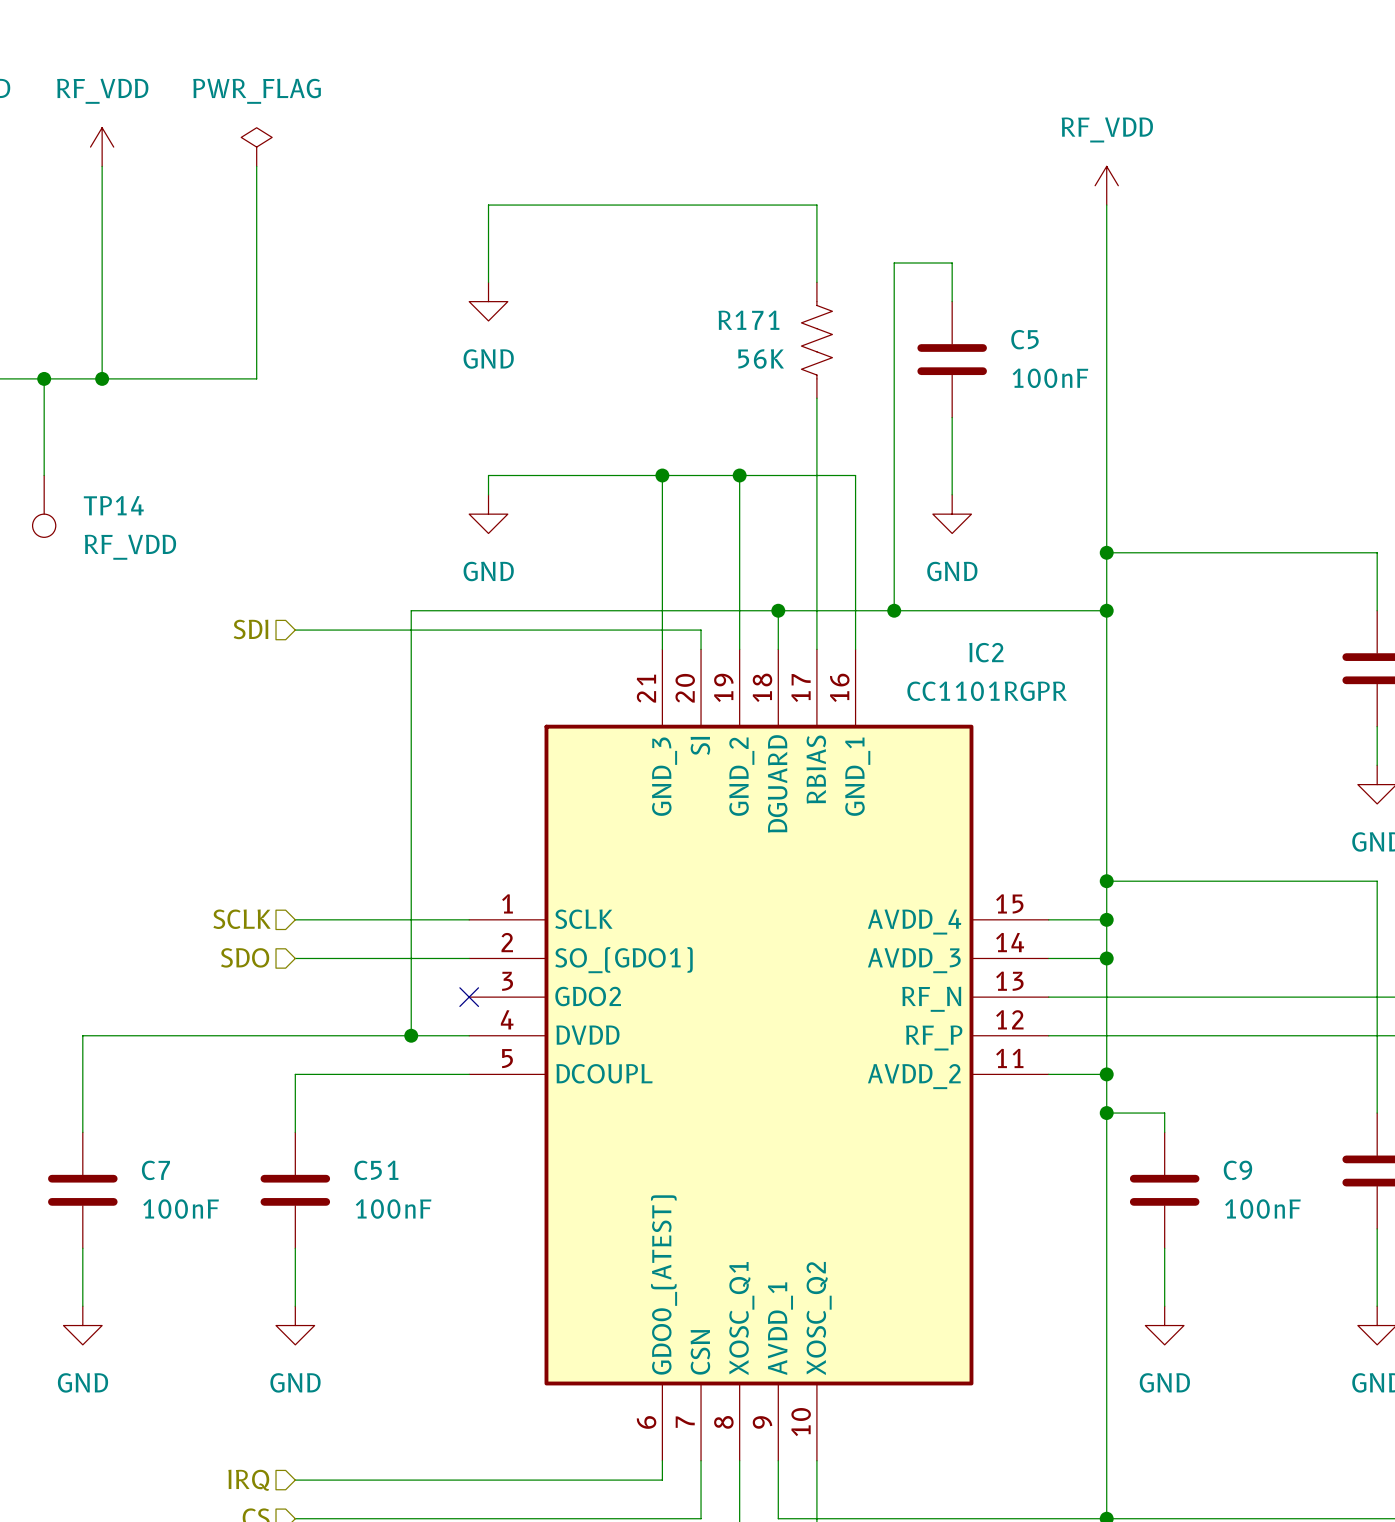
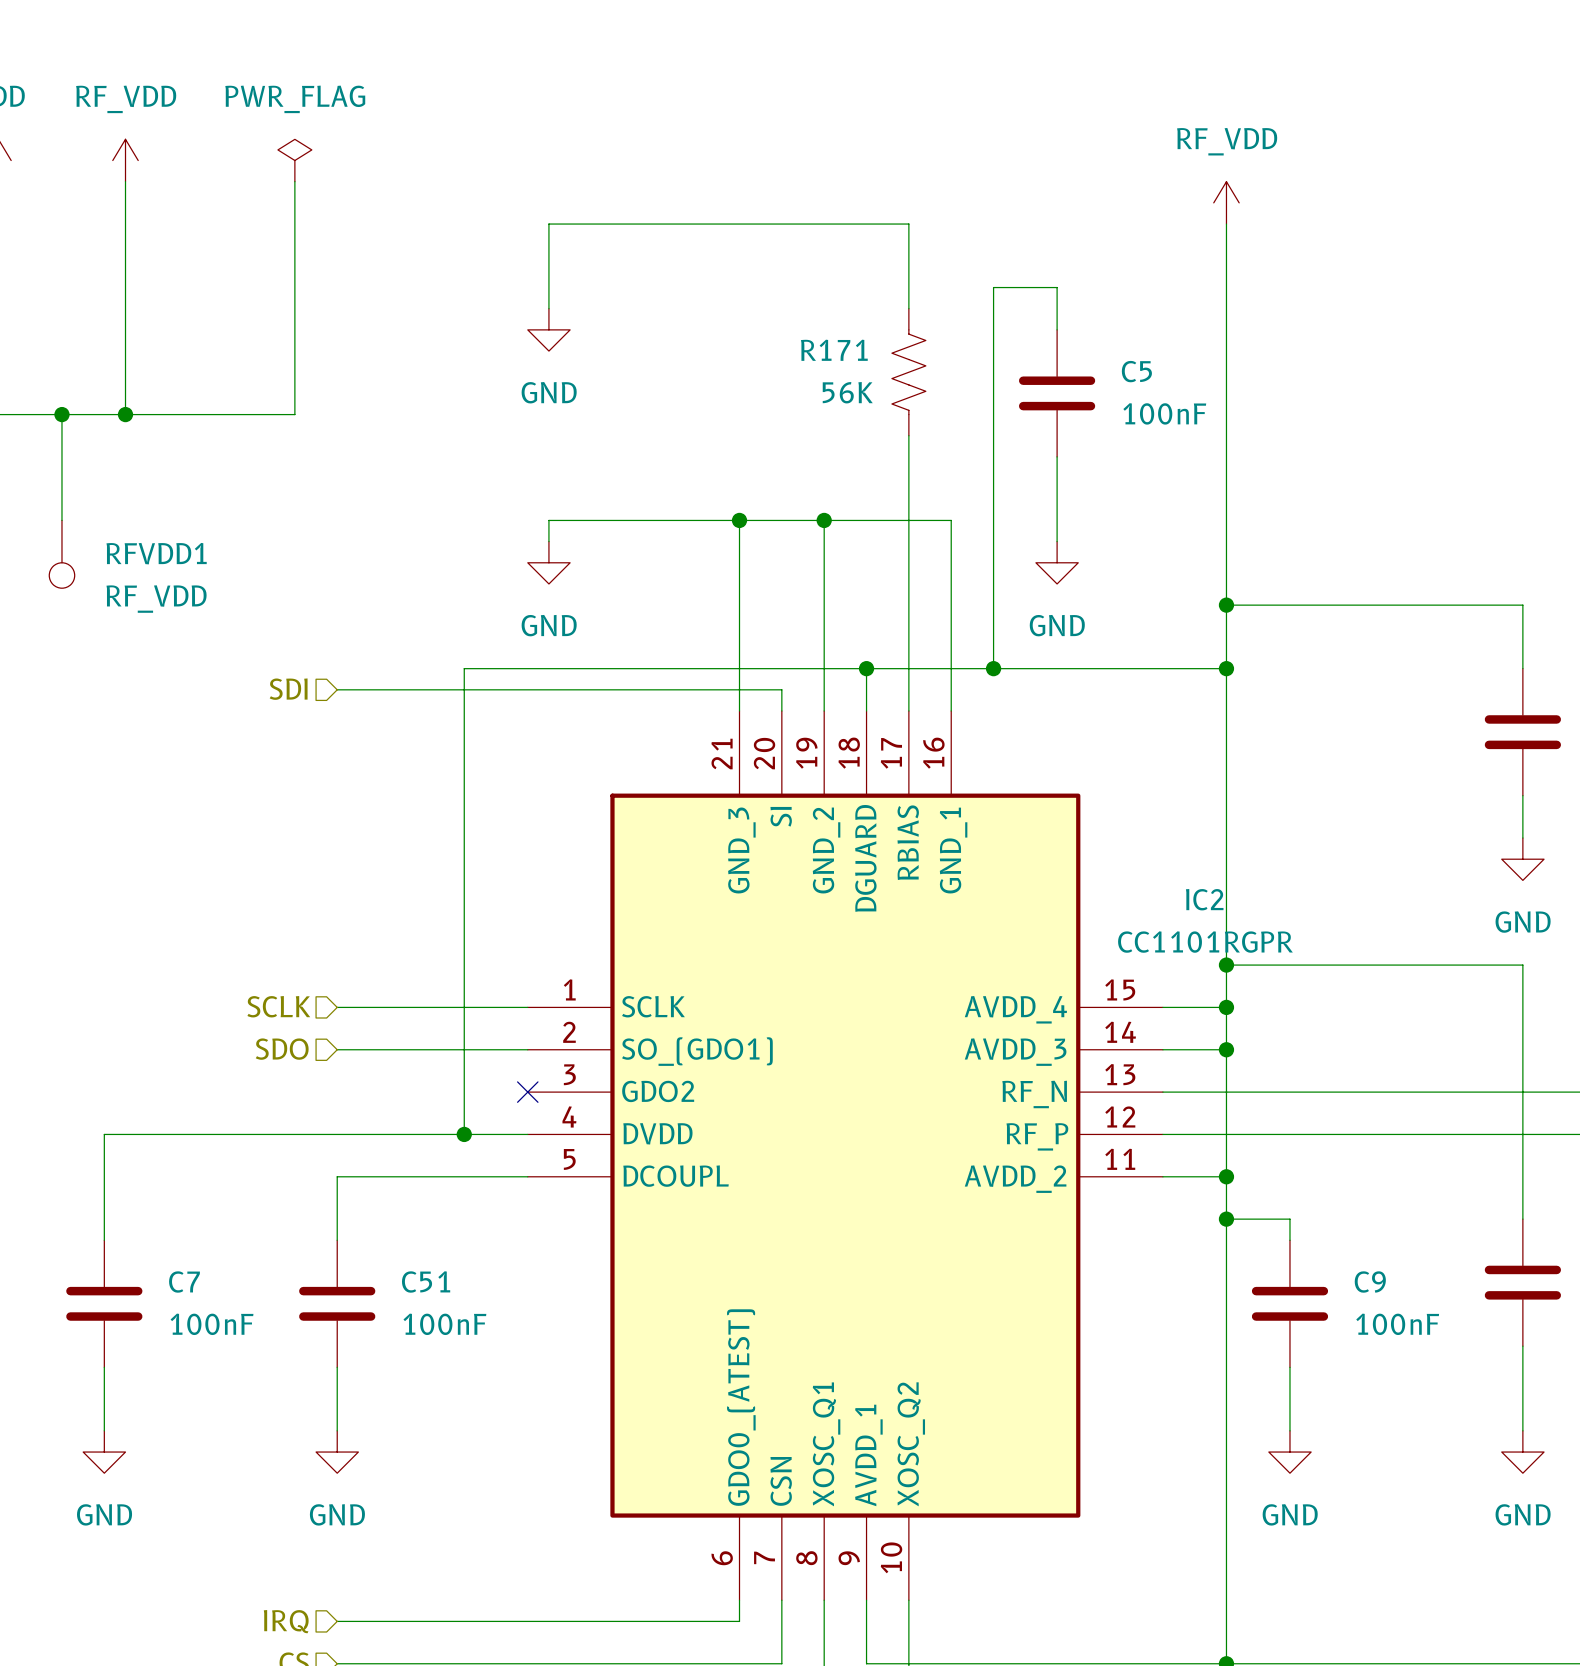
TP14 name: TP14 (113, 505) -> RFVDD1 (156, 553)
IC2 name position: IC2 (986, 652) -> IC2 (1204, 899)
IC2 value position: CC1101RGPR (987, 691) -> CC1101RGPR (1205, 942)

